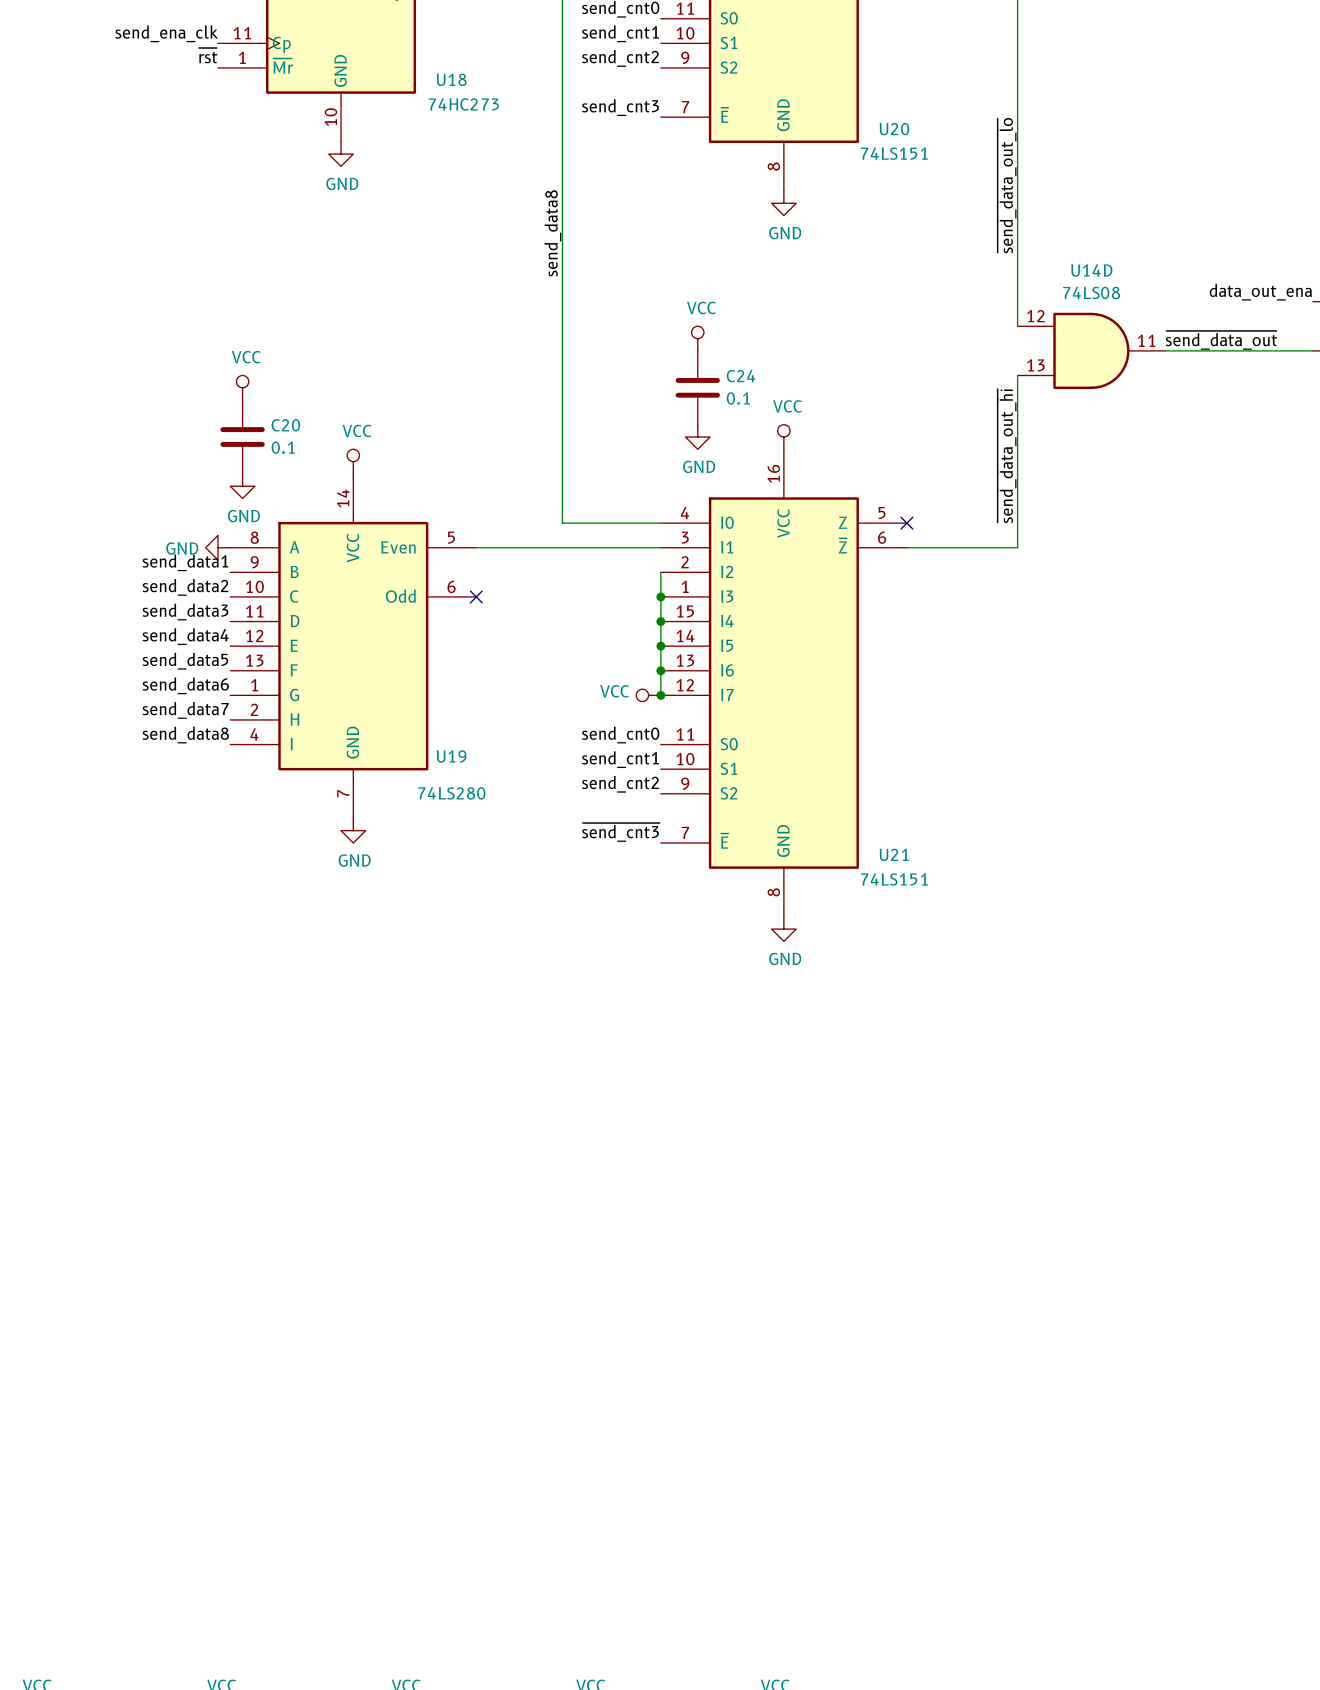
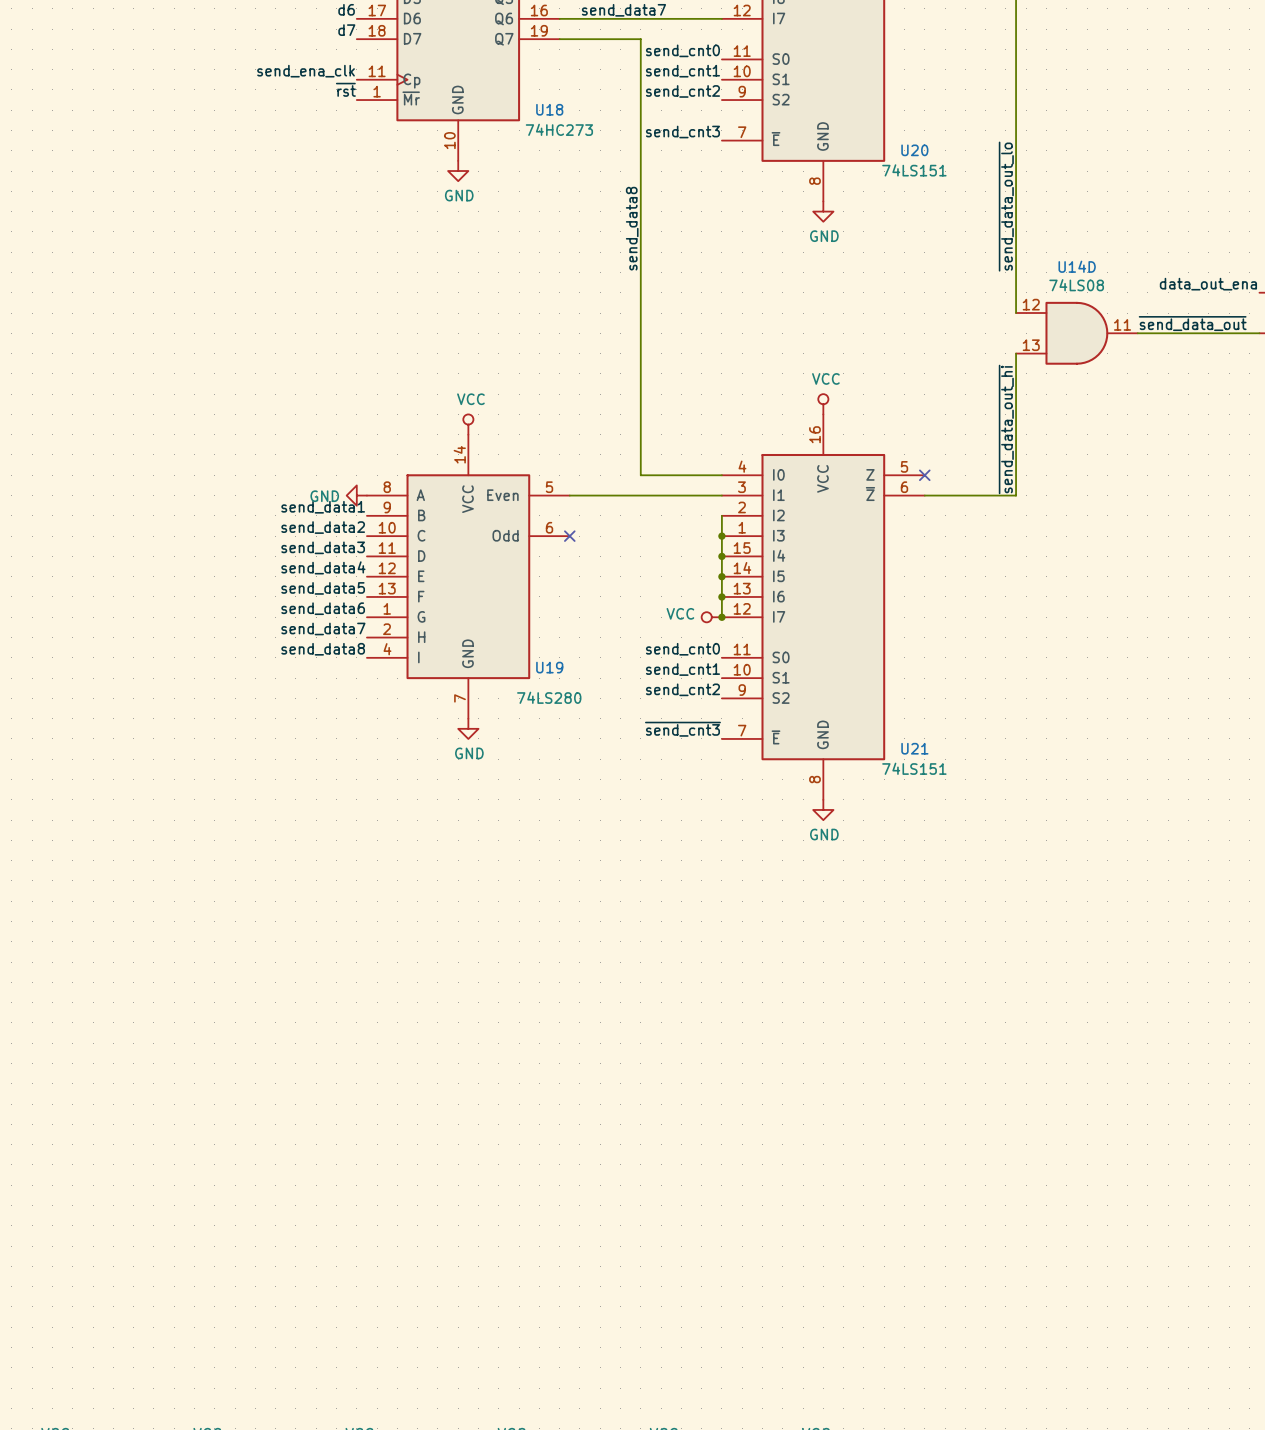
power symbol: VCC (697, 338) -> none
power symbol: VCC (242, 387) -> none
C24: 0.1 (697, 387) -> none
C20: 0.1 (242, 437) -> none
power symbol: GND (697, 437) -> none
power symbol: GND (242, 486) -> none

